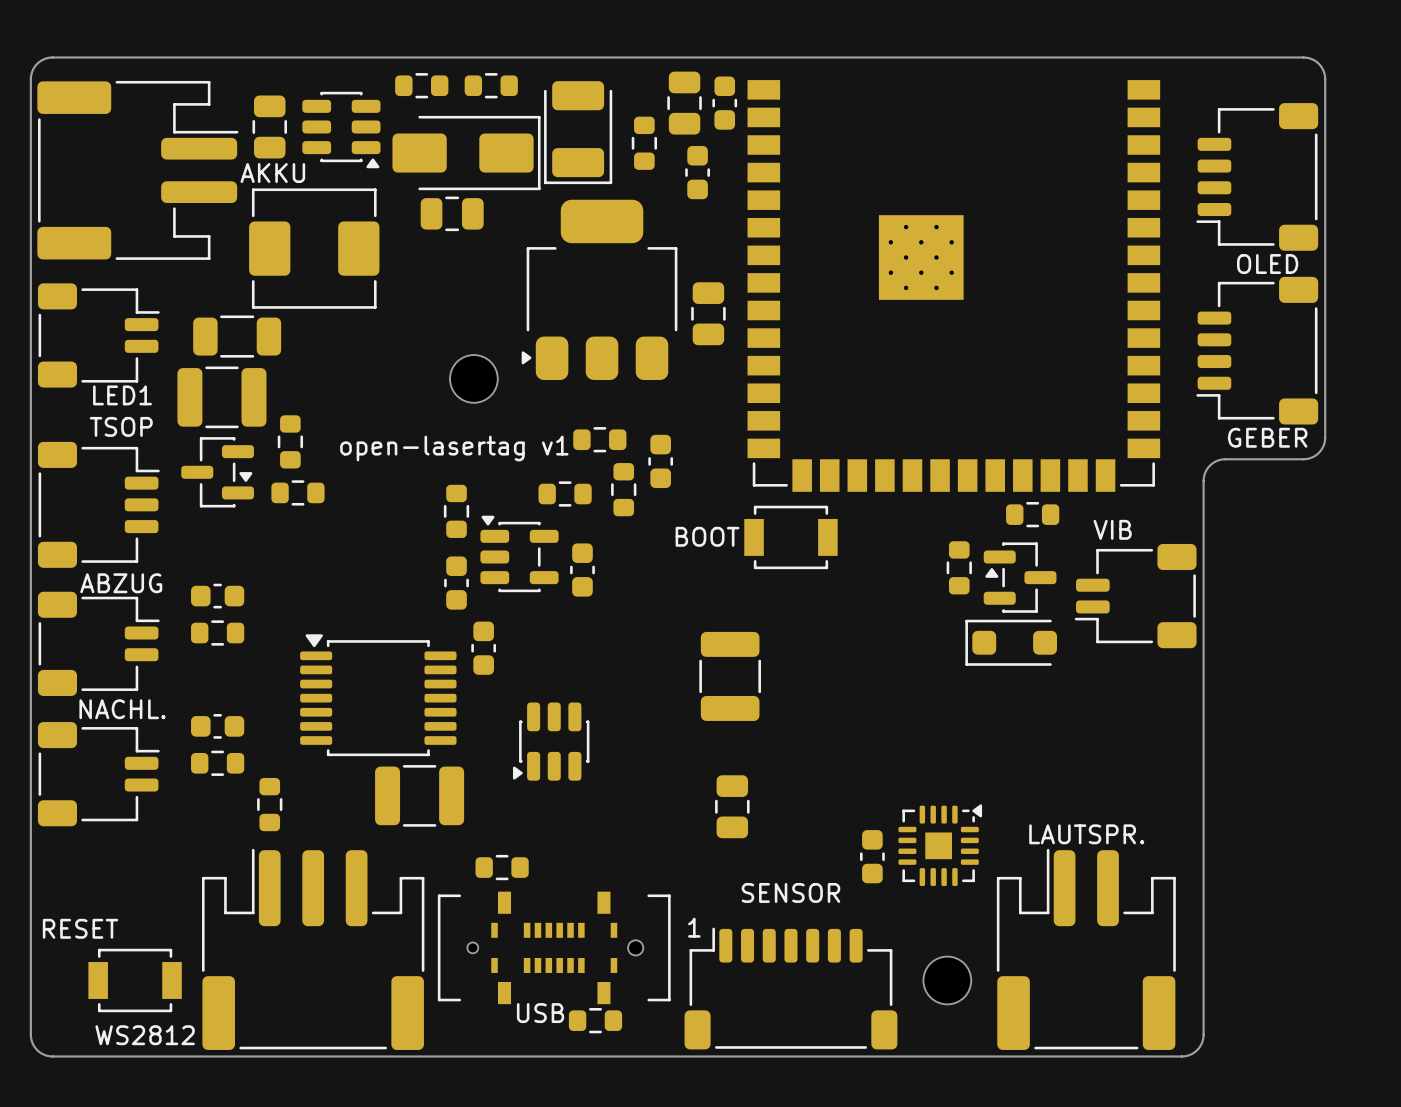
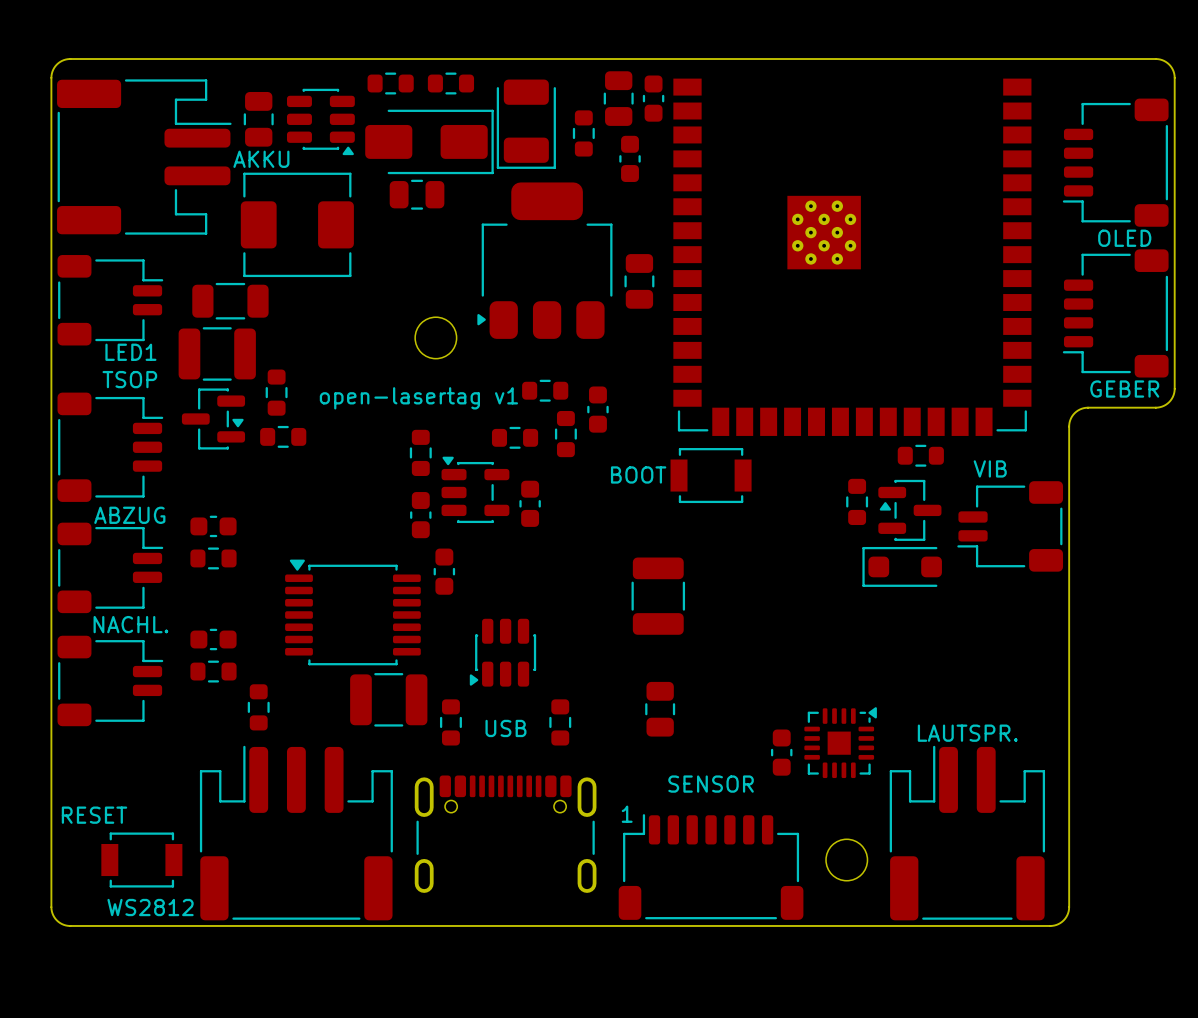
part: none -> (560, 722)
part rotation: 0° (502, 867) -> 90° clockwise (450, 722)
part position: (502, 867) -> (450, 722)
part footprint: [437, 891, 671, 1005] -> [414, 775, 597, 893]
text position: USB (540, 1013) -> USB (505, 728)
part: (595, 1020) -> none

